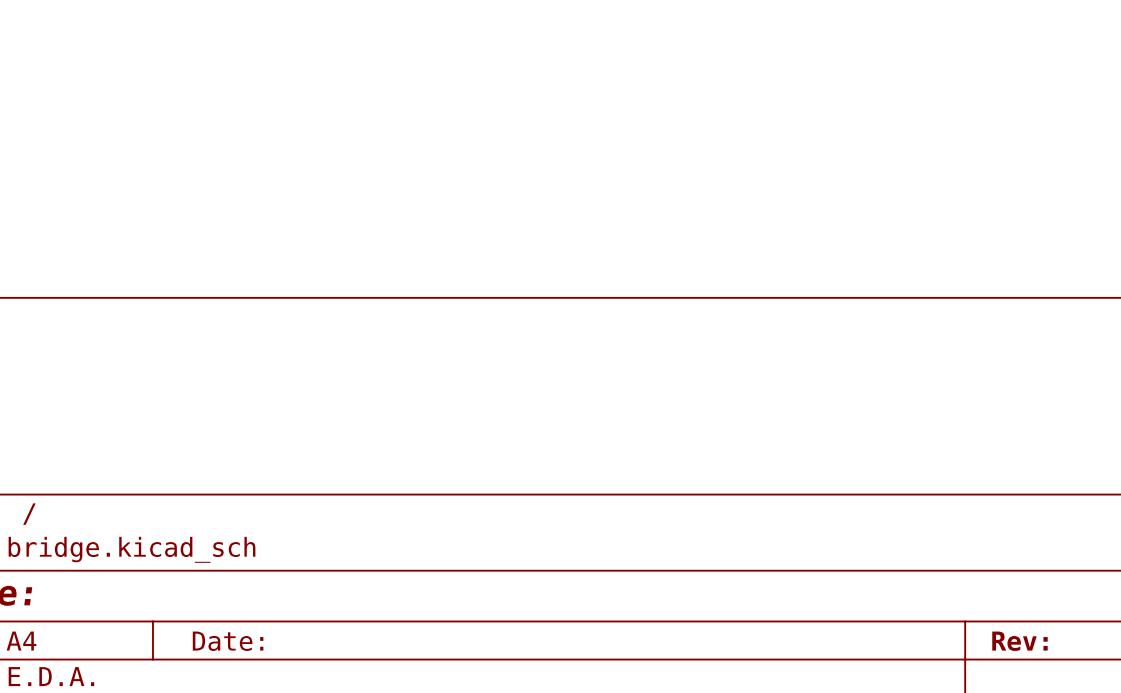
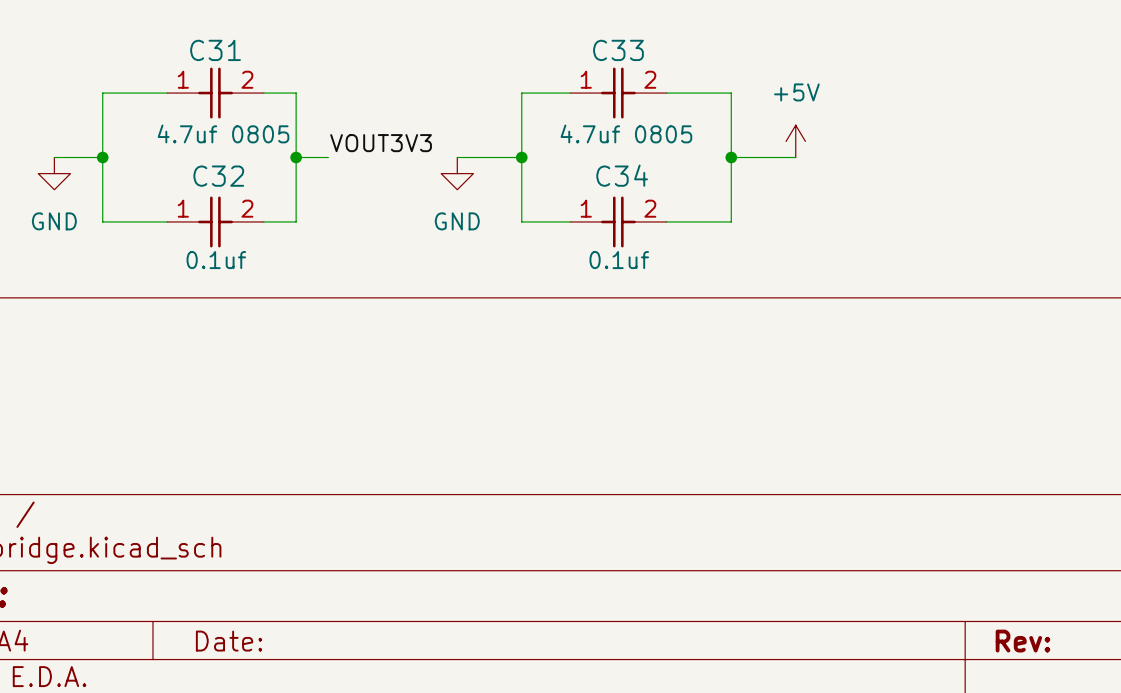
wire: none -> (167, 93) (102, 93) (102, 221) (167, 221)
C31: none -> (215, 93)
wire: none -> (263, 93) (296, 93) (296, 221) (263, 221)
wire: none -> (570, 93) (521, 93) (521, 221) (570, 221)
C33: none -> (618, 93)
wire: none -> (666, 93) (731, 93) (731, 221) (666, 221)
power symbol: none -> +5V (795, 141)
label: none -> VOUT3V3 (381, 143)
wire: none -> (54, 157) (102, 157)
junction: none -> (102, 157)
wire: none -> (296, 157) (328, 157)
junction: none -> (296, 157)
wire: none -> (457, 157) (521, 157)
junction: none -> (521, 157)
wire: none -> (731, 157) (795, 157)
junction: none -> (731, 157)
power symbol: none -> GND (54, 173)
power symbol: none -> GND (457, 173)
C32: none -> (215, 221)
C34: none -> (618, 221)

